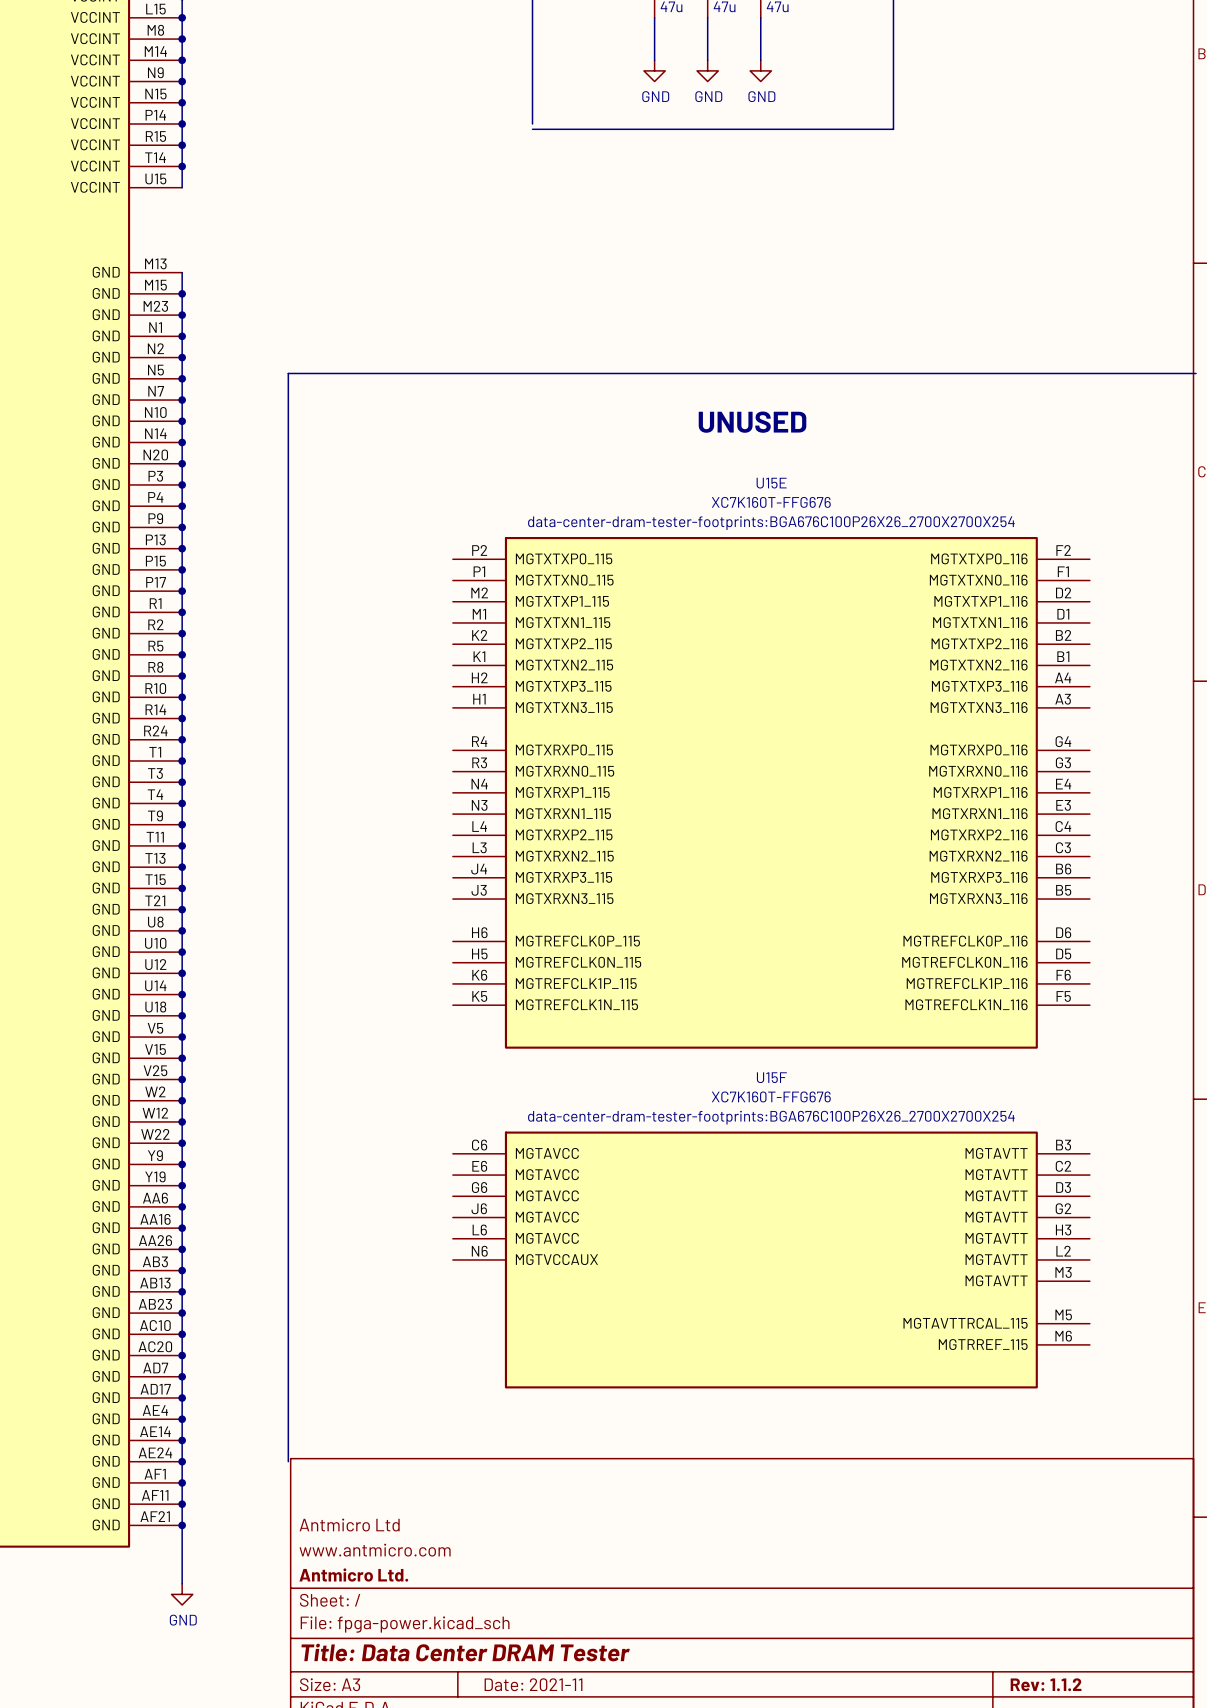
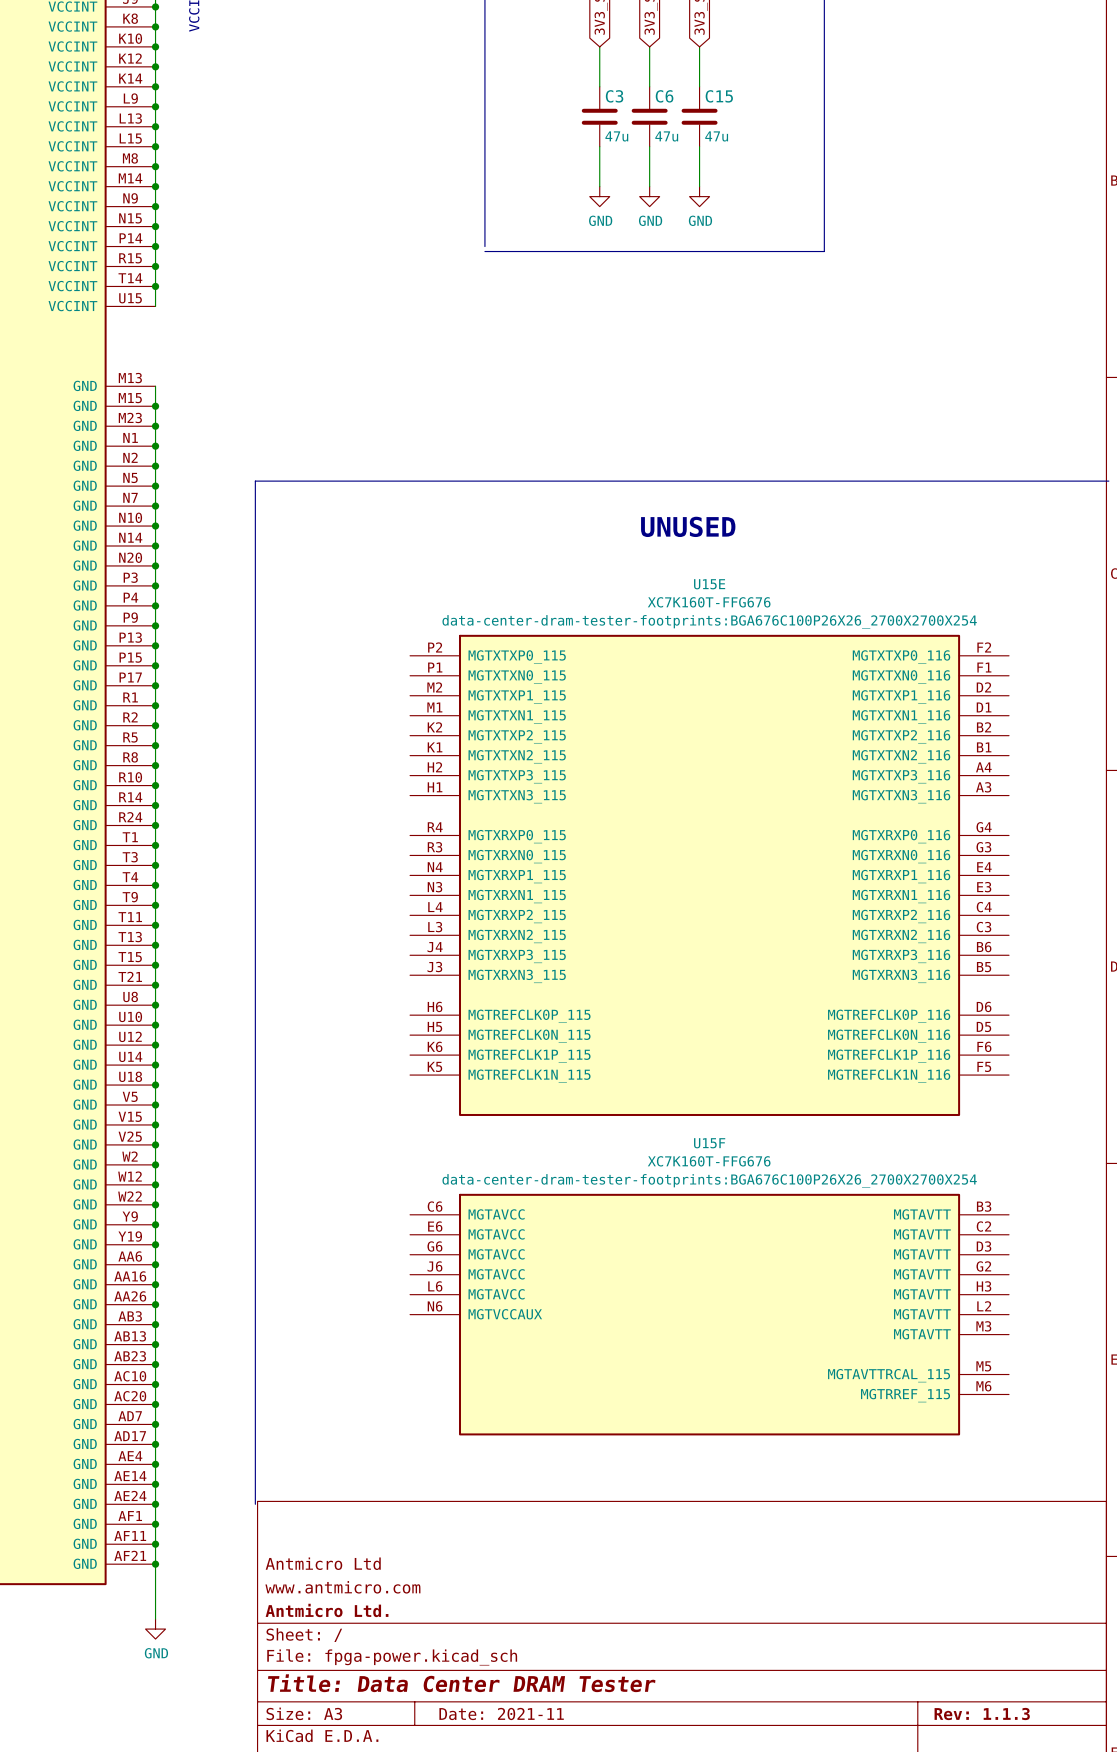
title block: Rev: 1.1.2 (1046, 1684) -> Rev: 1.1.3 (982, 1713)

